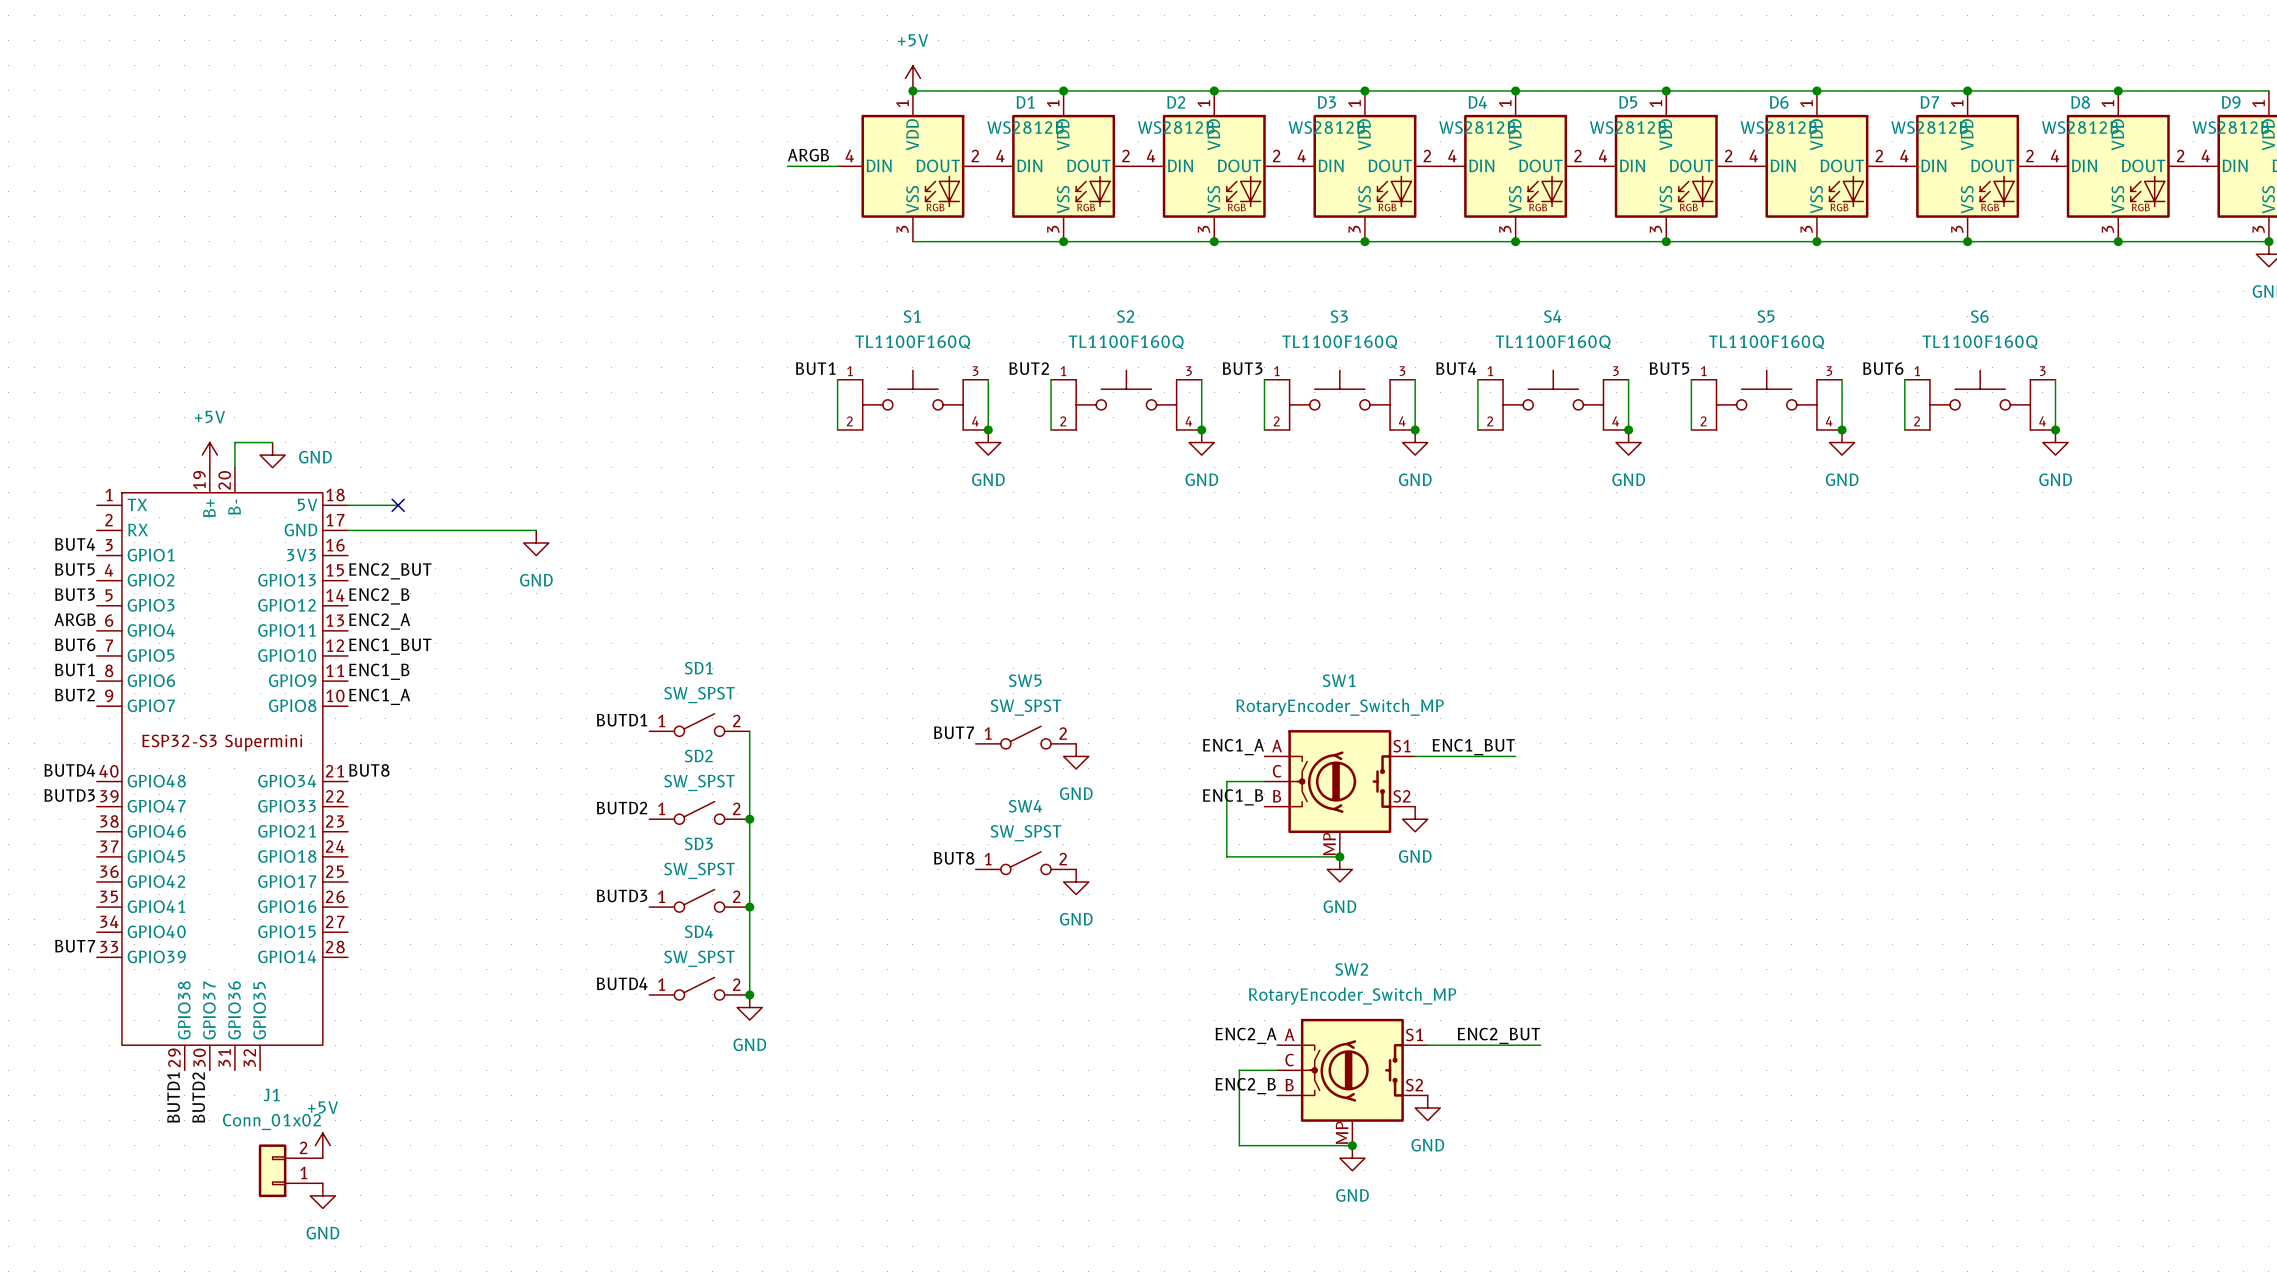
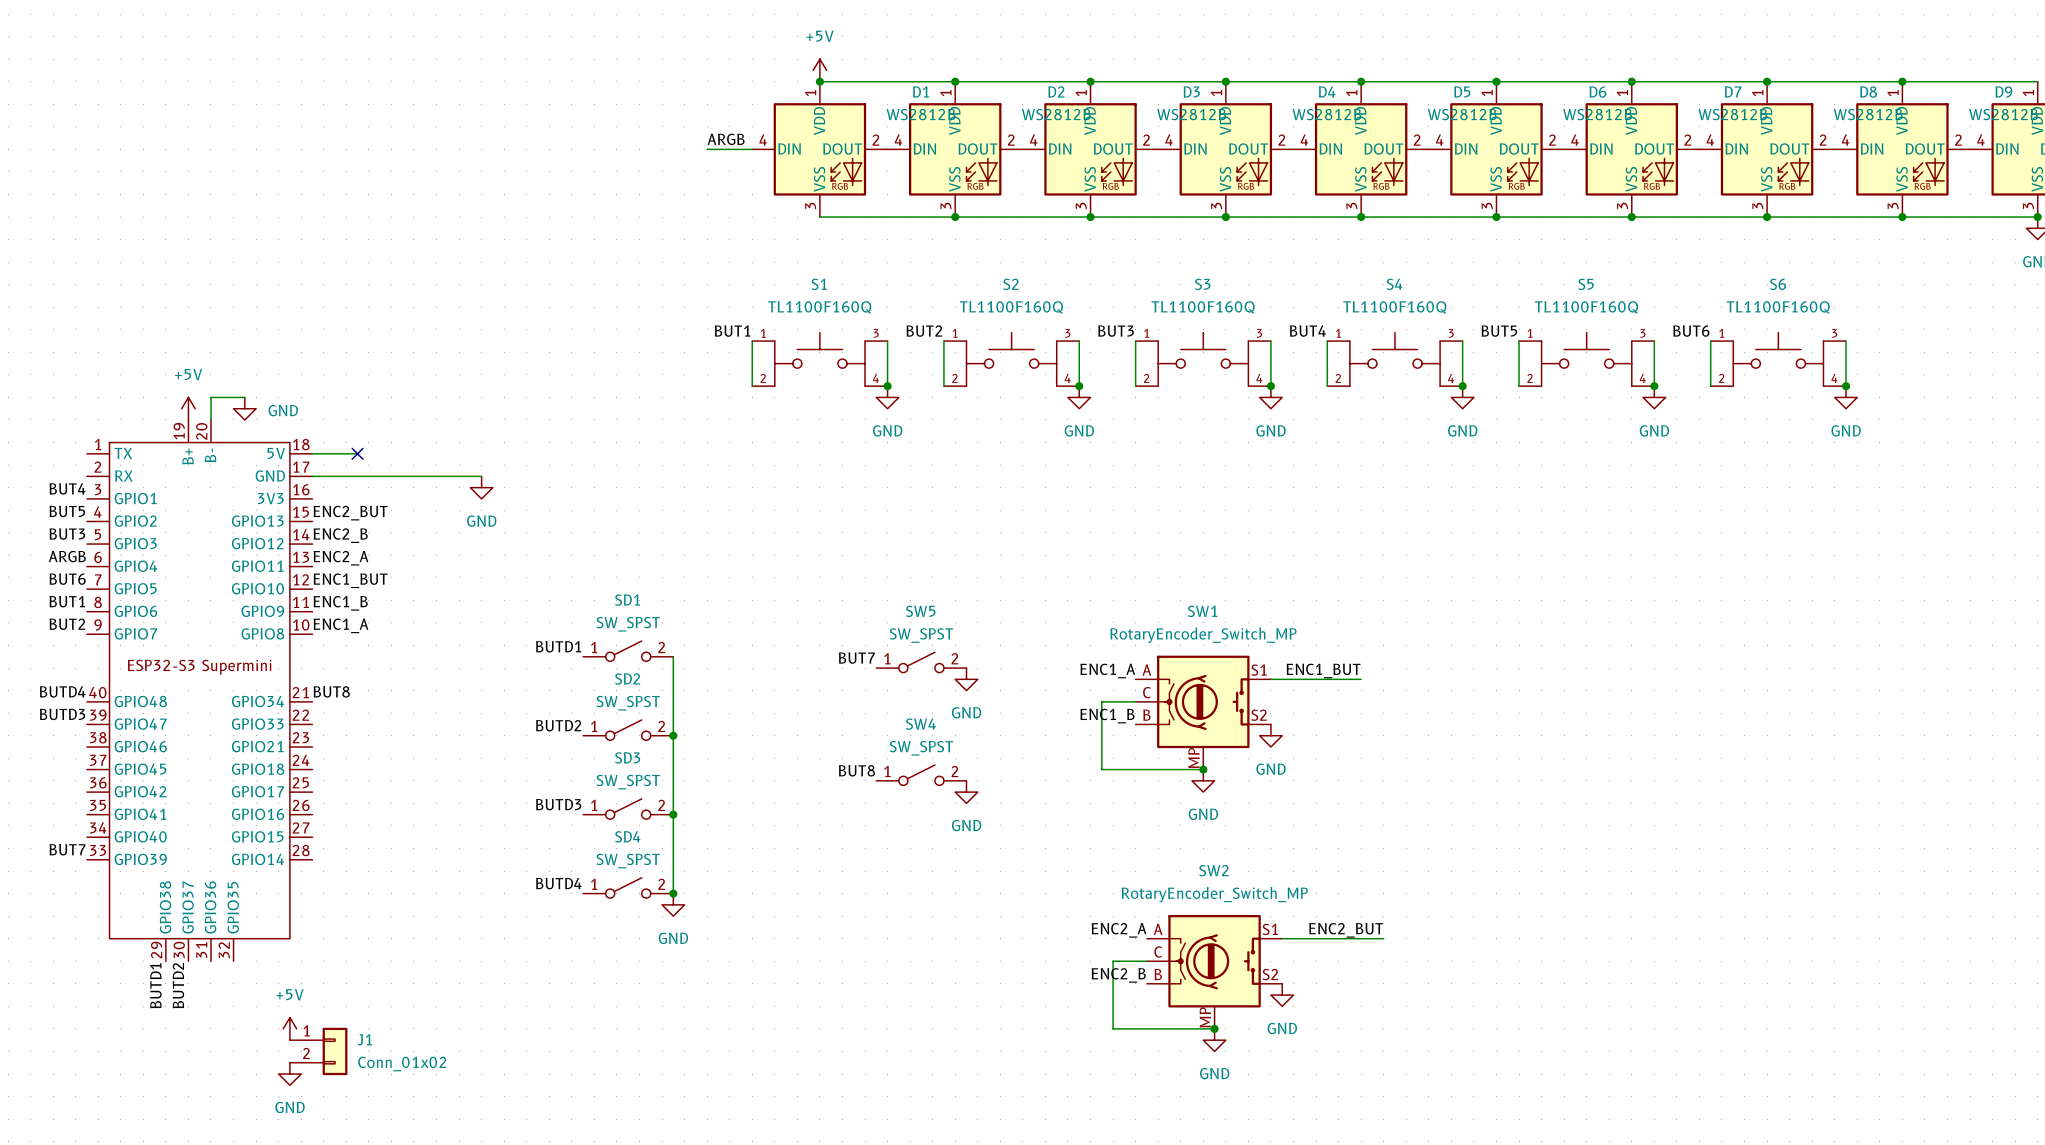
J1 name position: J1 (271, 1095) -> J1 (364, 1039)
J1 value position: Conn_01x02 (271, 1121) -> Conn_01x02 (402, 1063)
J1 rotation: 0° (272, 1170) -> 180° (335, 1051)
J1 position: (290, 1170) -> (318, 1051)

